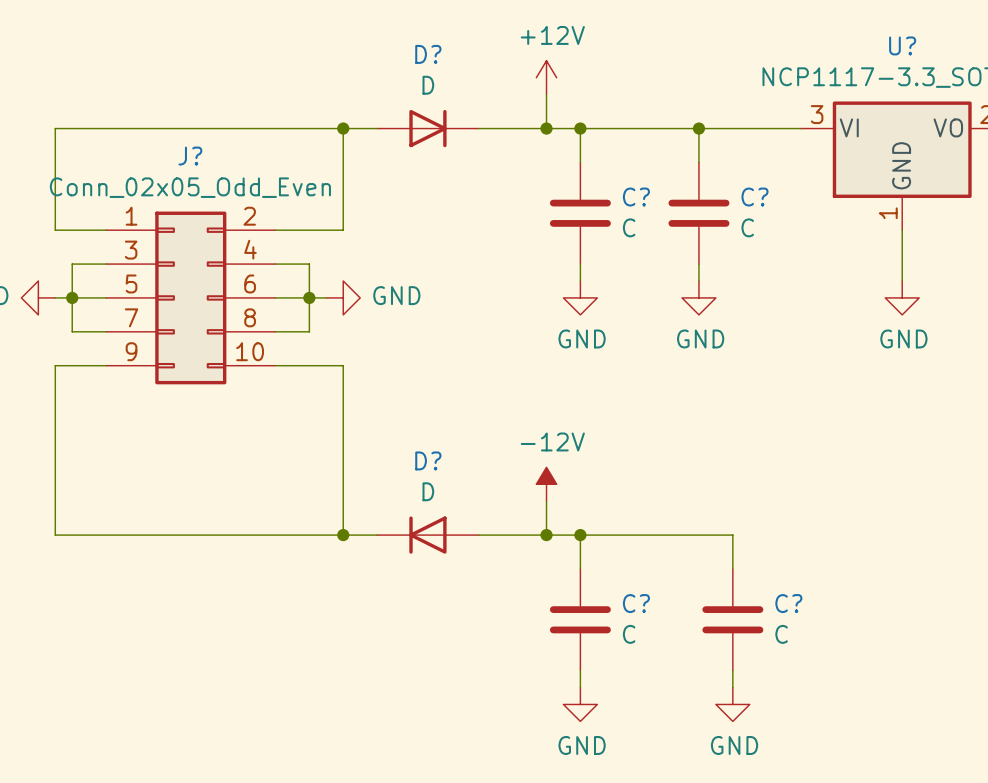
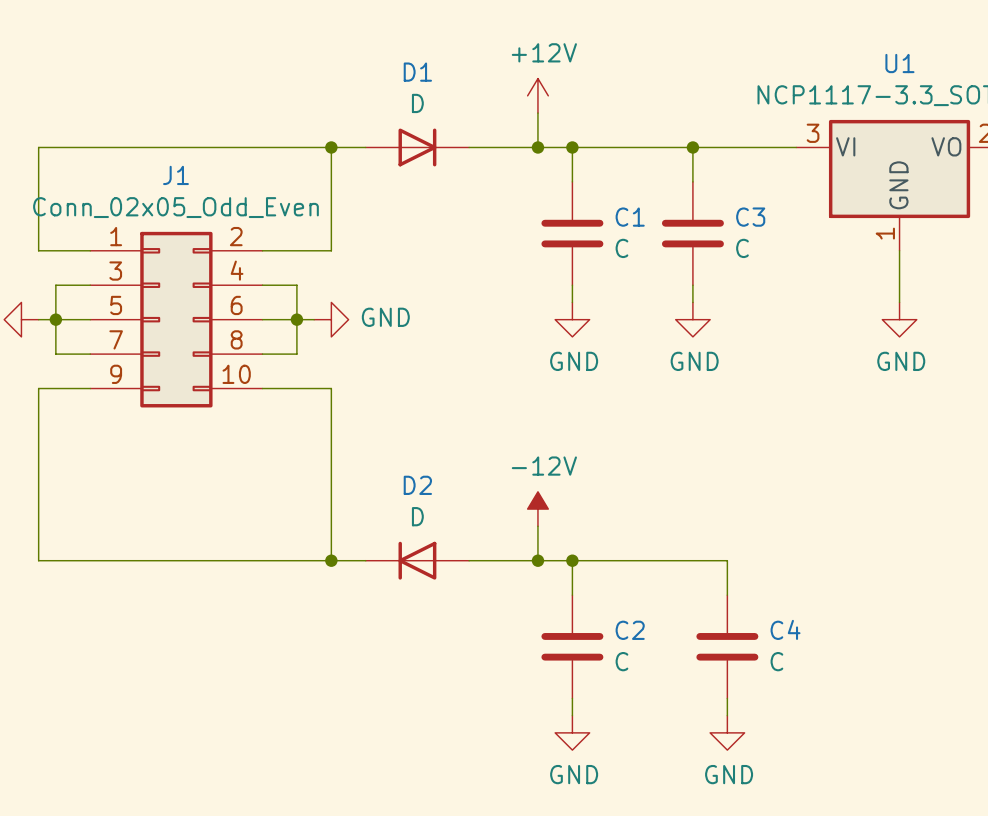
U? name: U? (902, 45) -> U1 (899, 63)
D? name: D? (428, 54) -> D1 (417, 72)
J? name: J? (190, 156) -> J1 (175, 175)
C? name: C? (636, 197) -> C1 (630, 217)
C? name: C? (754, 197) -> C3 (750, 217)
D? name: D? (428, 460) -> D2 (417, 485)
C? name: C? (636, 603) -> C2 (630, 630)
C? name: C? (788, 603) -> C4 (785, 629)

